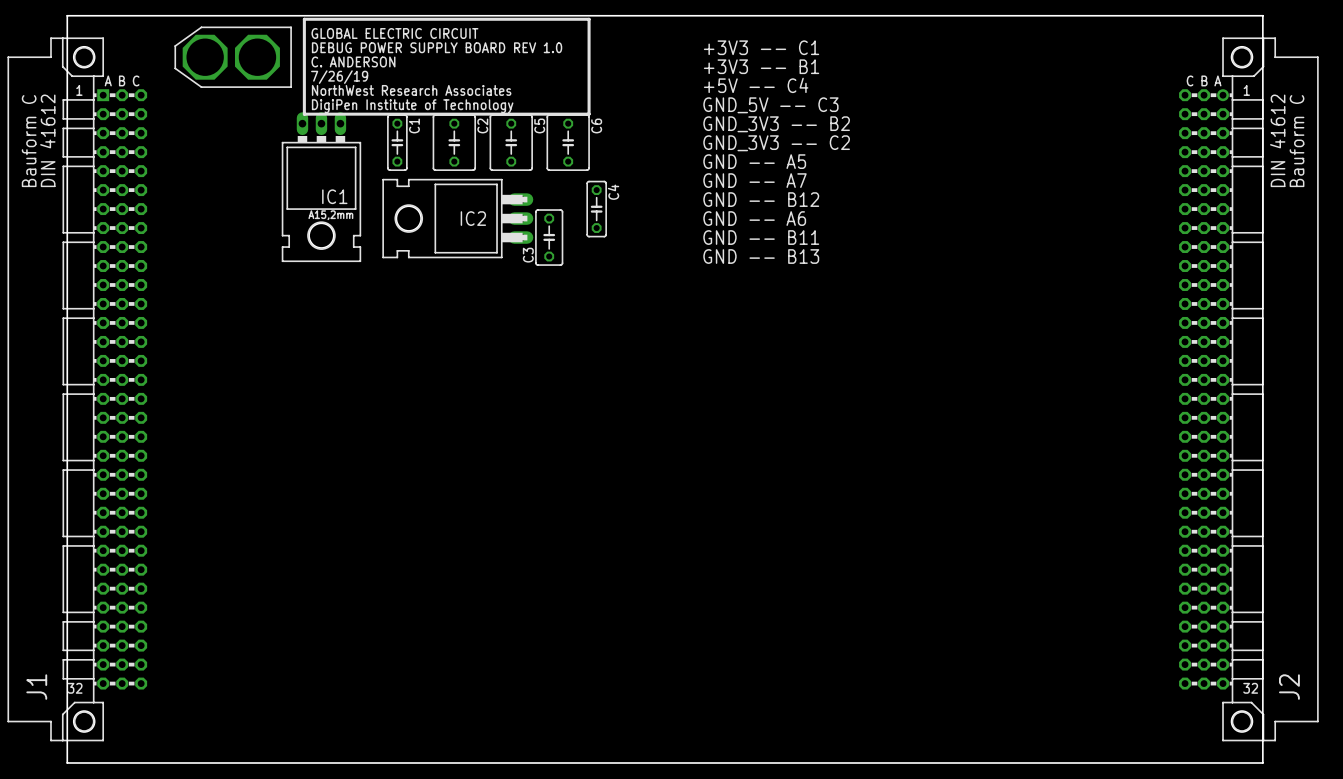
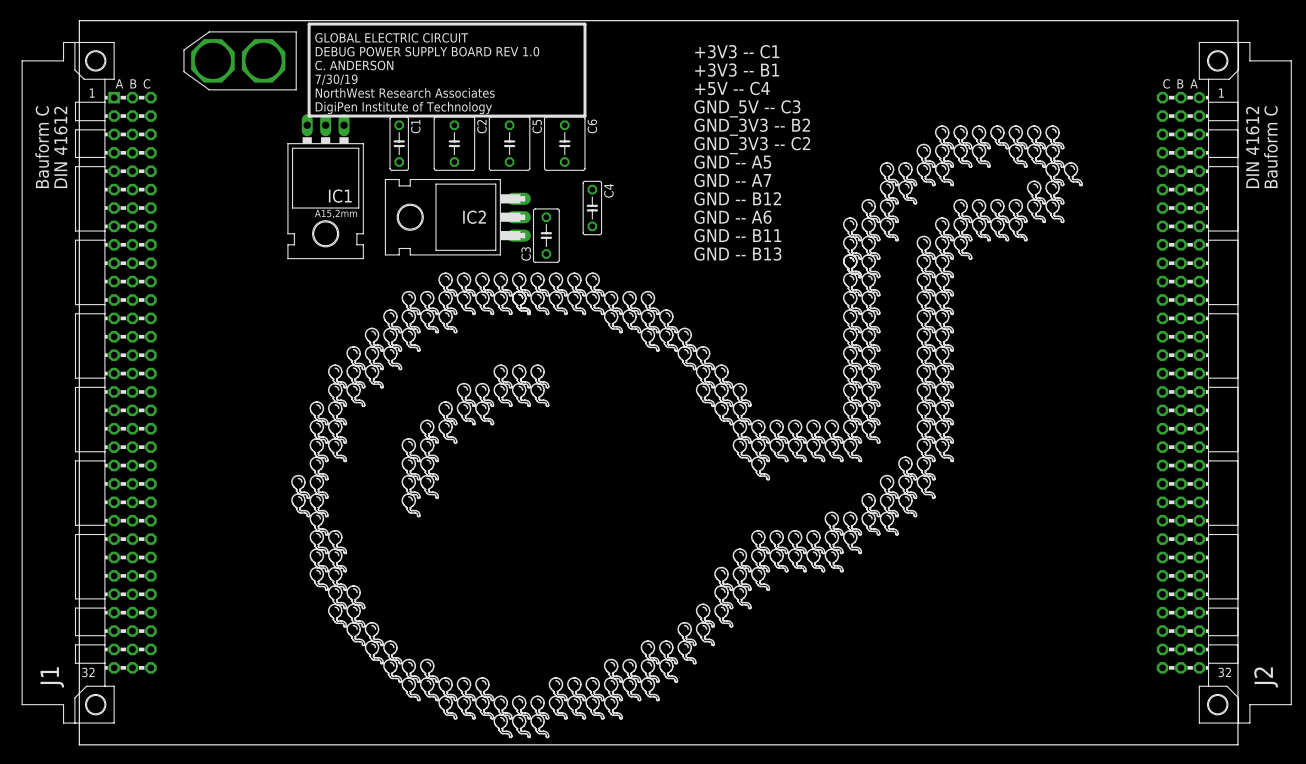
text: 7/26/19 (339, 77) -> 7/30/19 (336, 79)
drawing: none -> [291, 125, 1083, 739]
drawing: none -> [401, 364, 550, 518]

